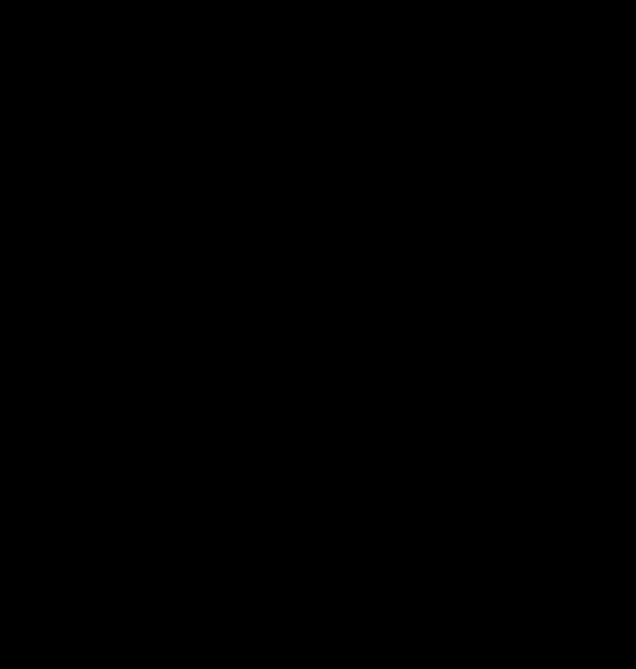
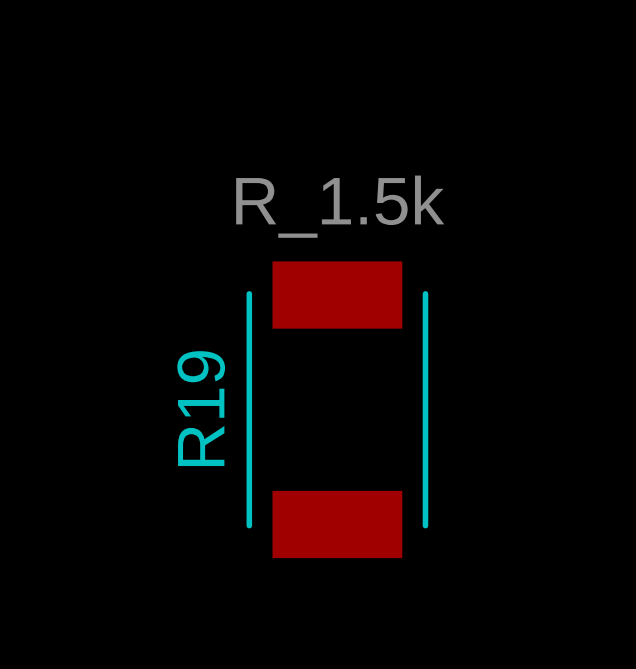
R19: none -> R_1.5k (337, 409)

